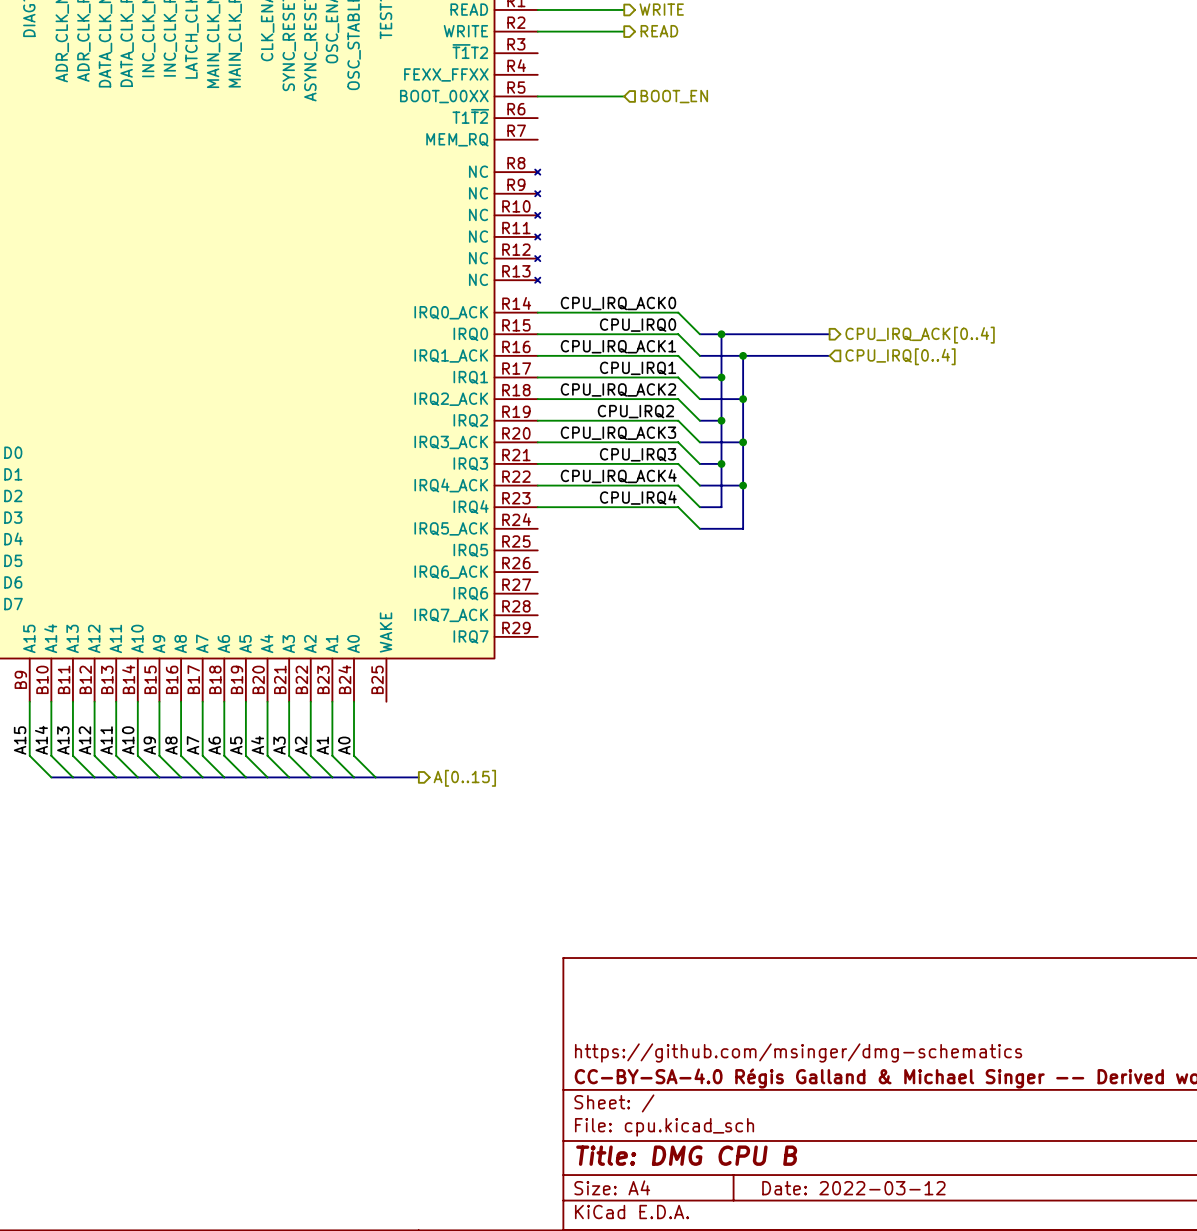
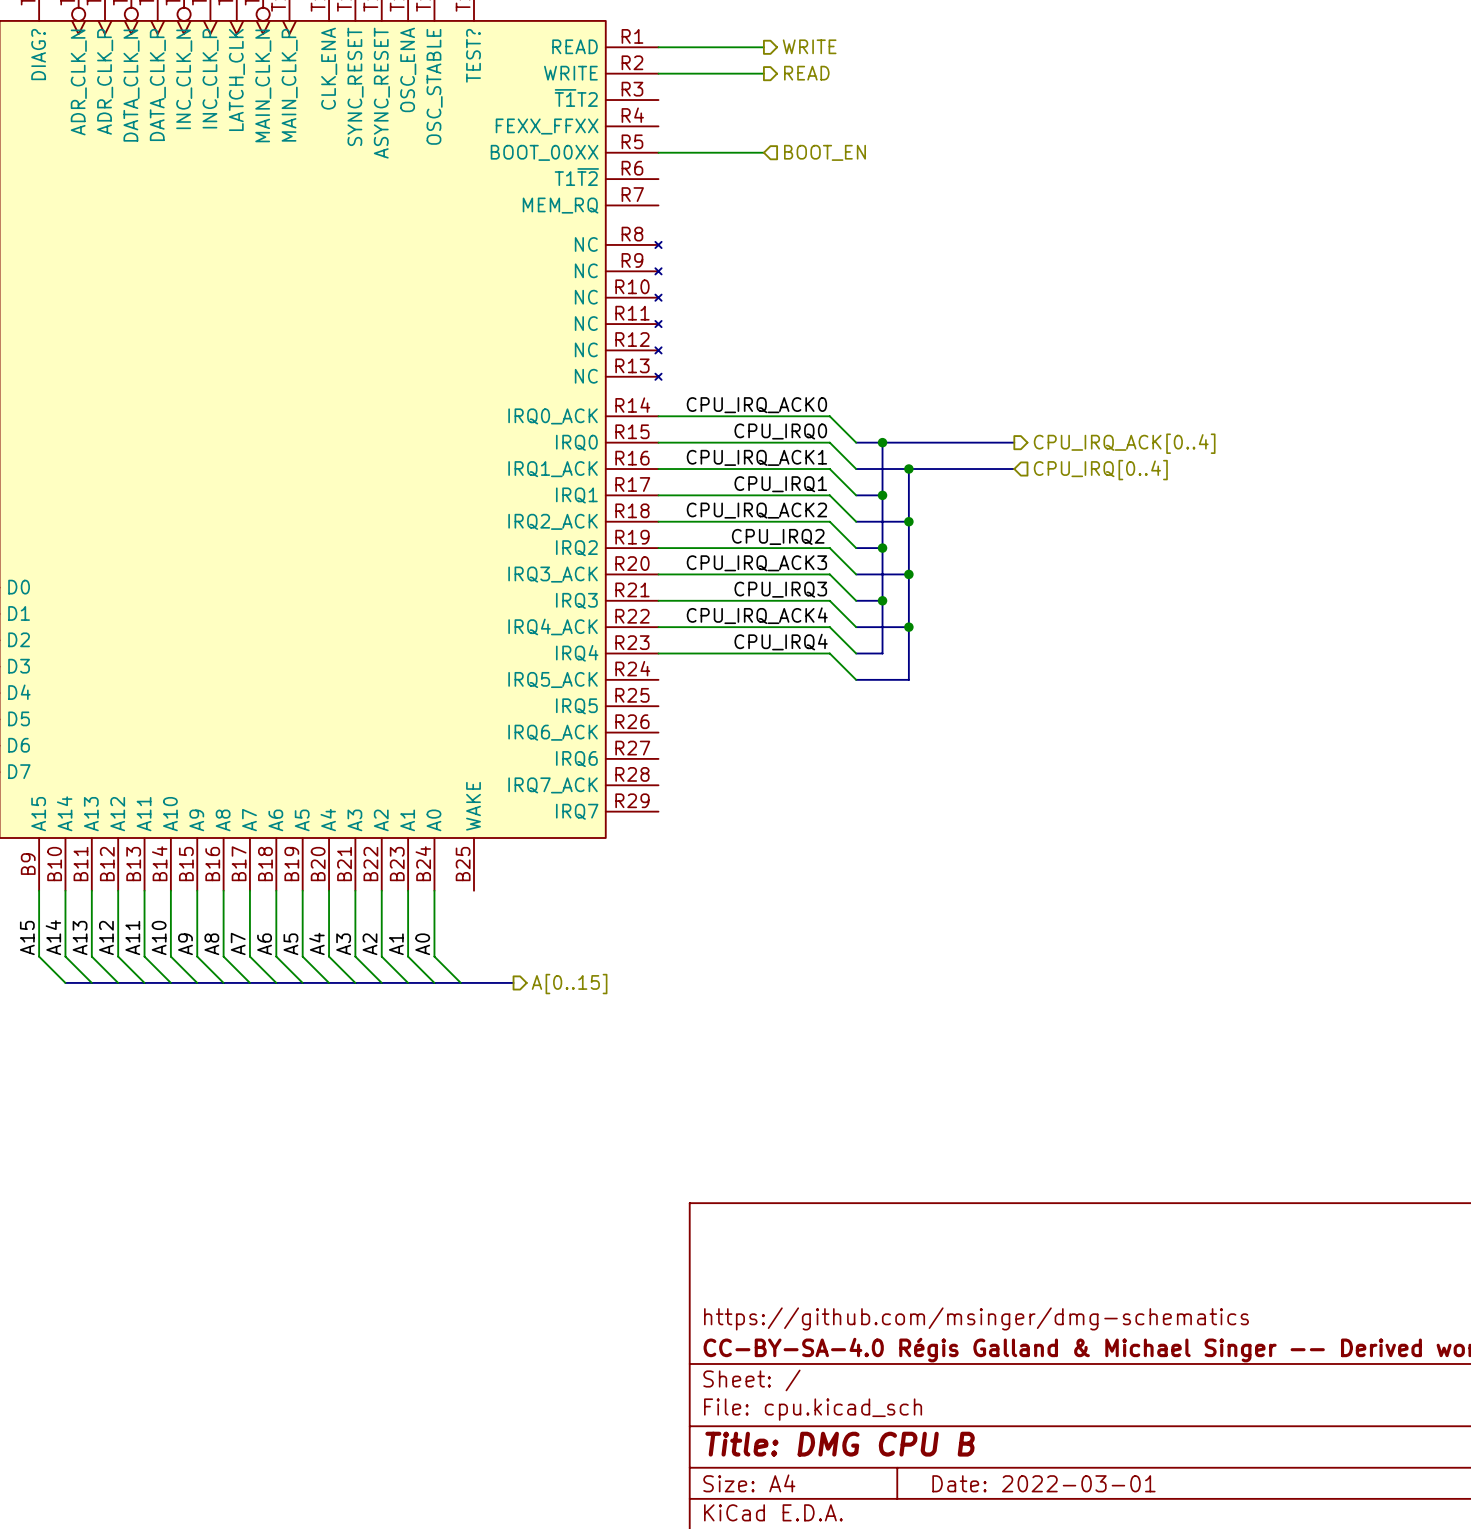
title block: Date: 2022-03-12 (853, 1188) -> Date: 2022-03-01 (1043, 1483)

